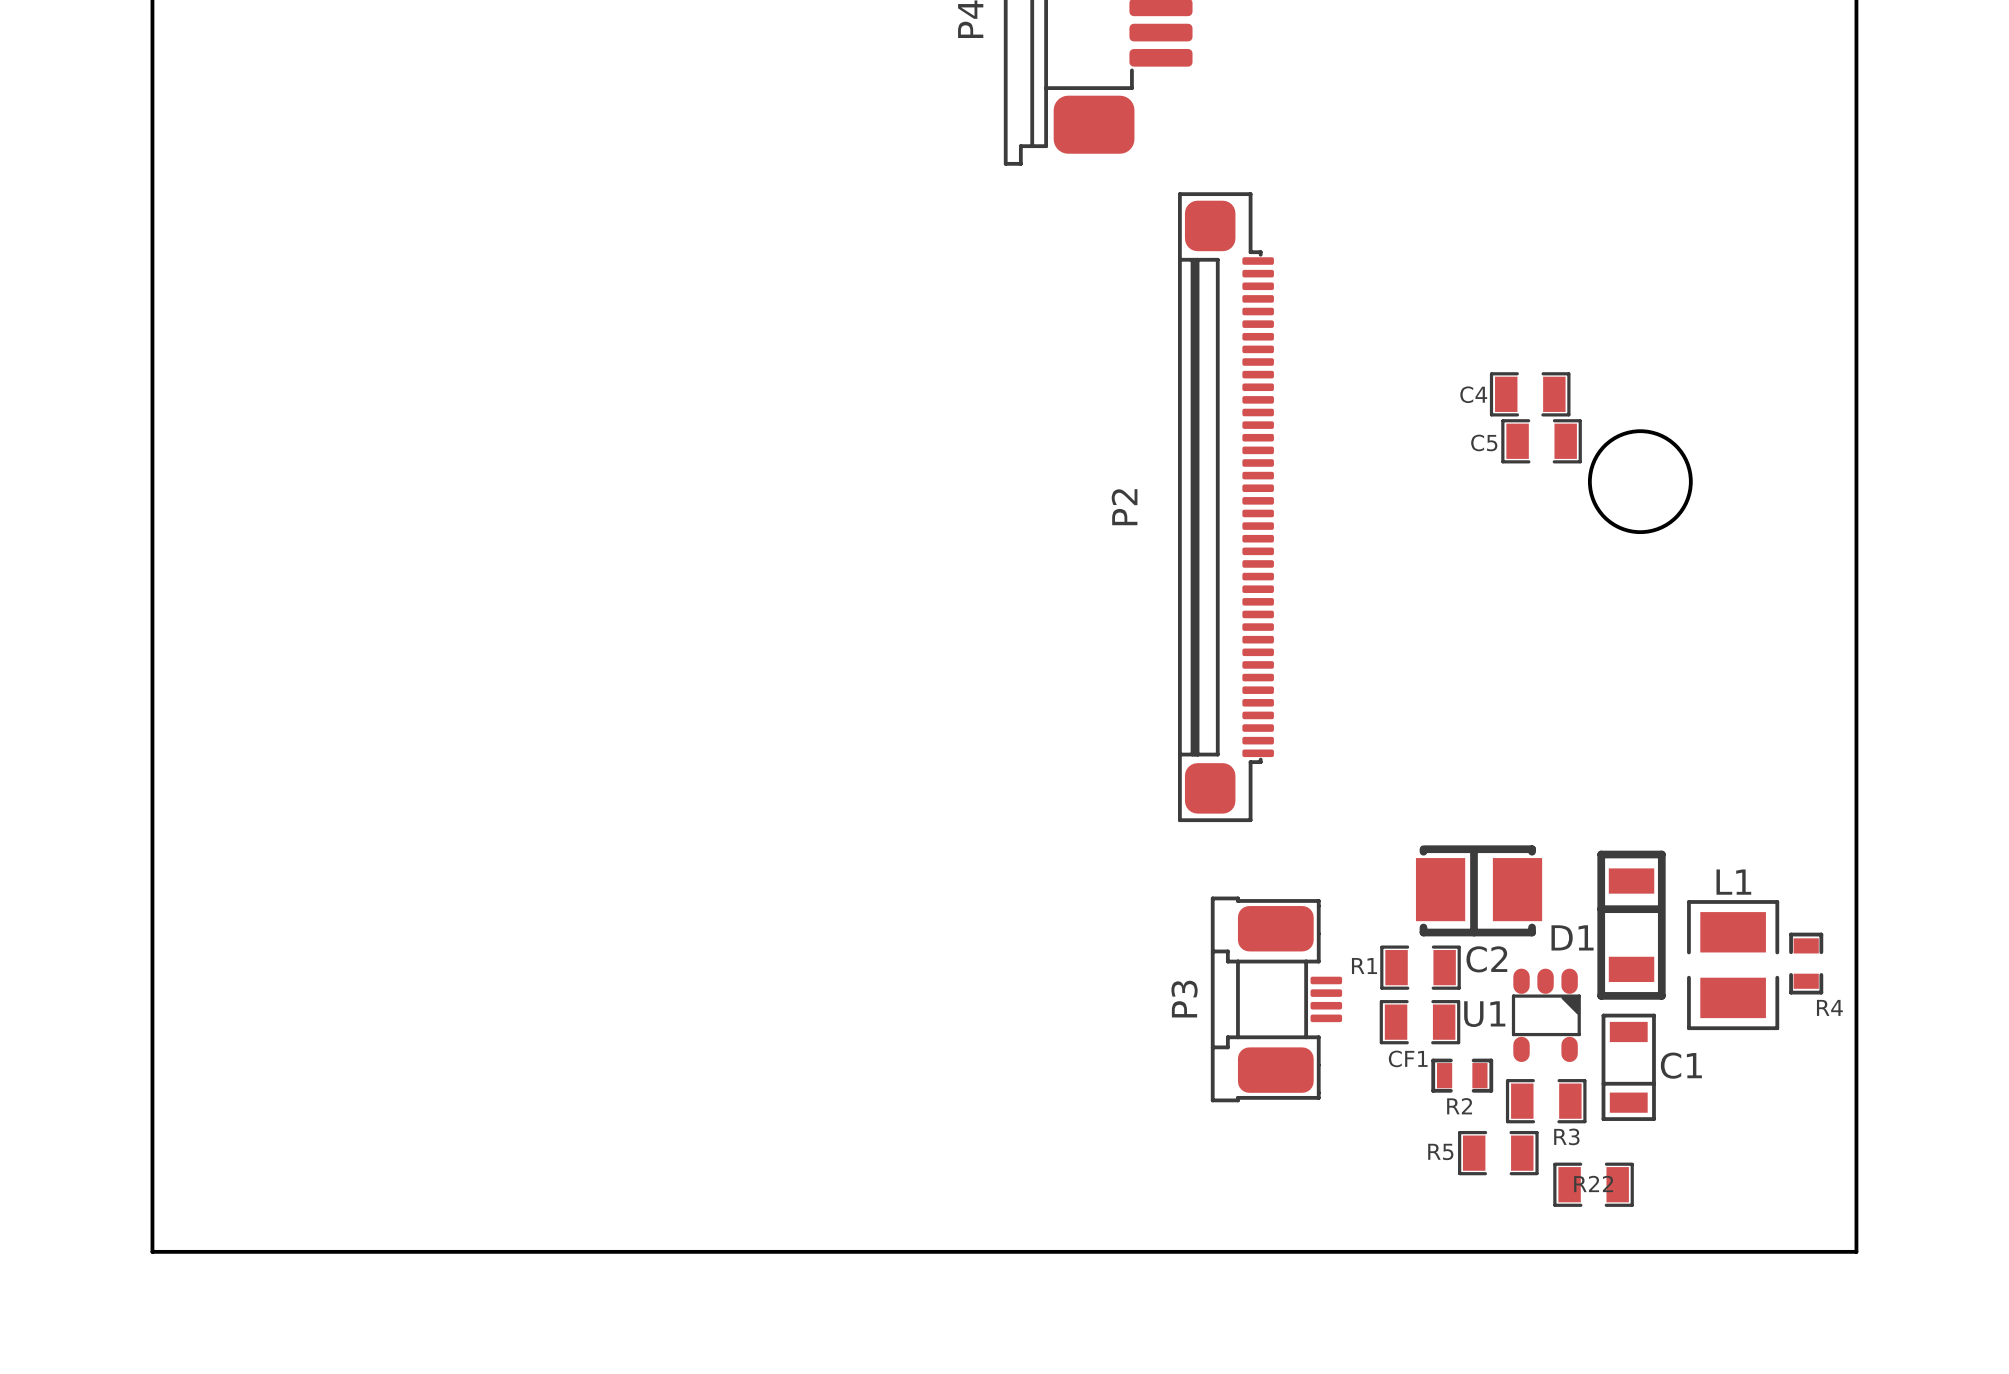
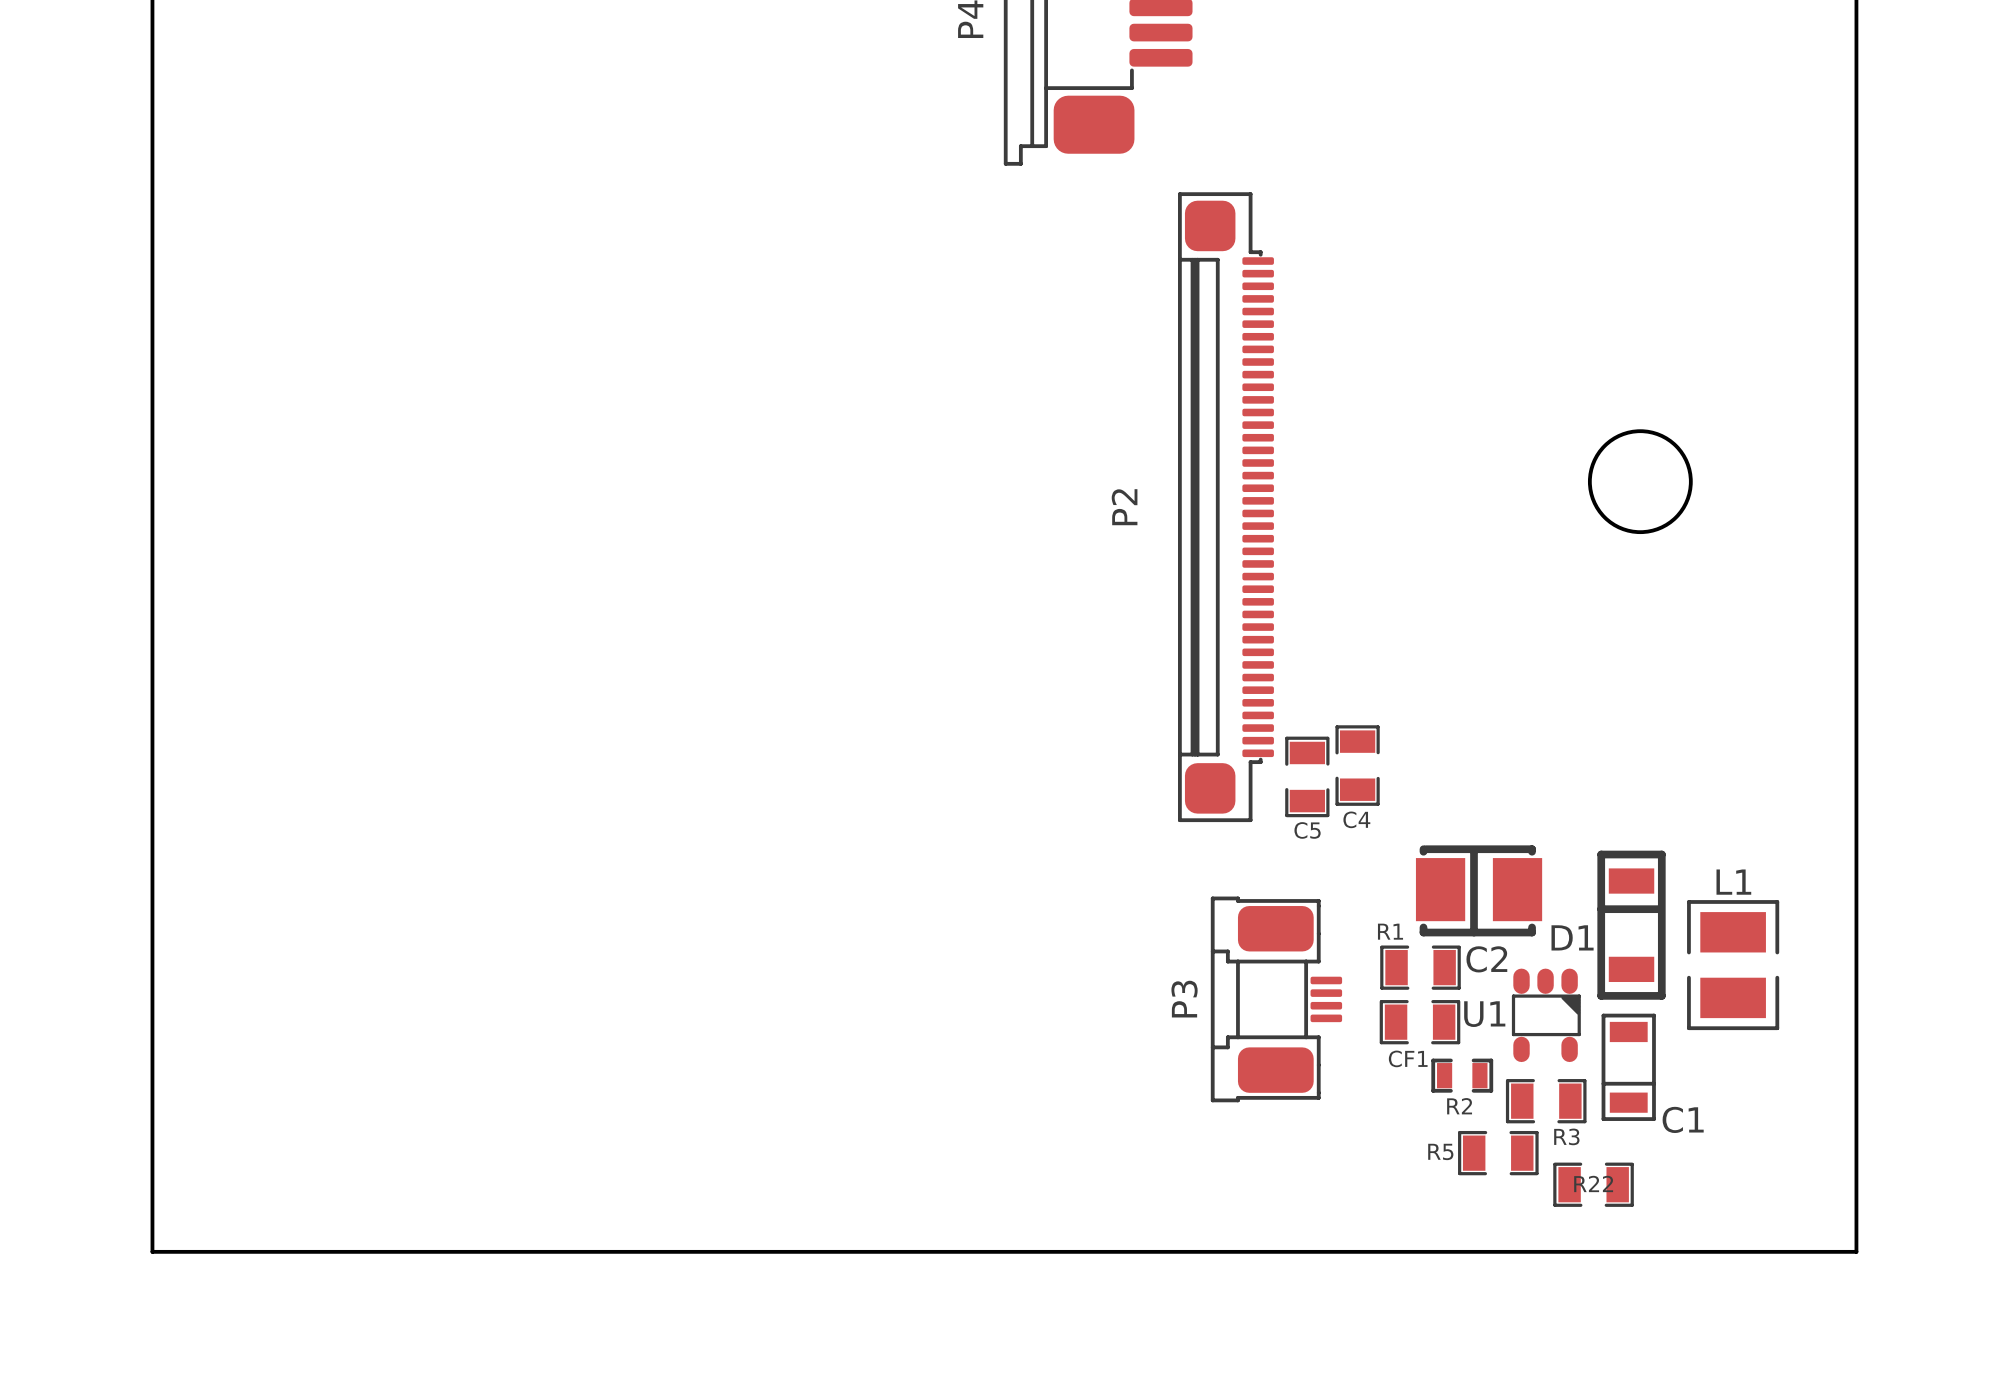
C4 name position: C4 (1473, 394) -> C4 (1356, 819)
C4 rotation: 0° (1530, 394) -> 90° clockwise (1357, 765)
C4 position: (1530, 394) -> (1357, 765)
C5 rotation: 0° (1541, 441) -> 90° clockwise (1307, 776)
C5 position: (1541, 441) -> (1307, 776)
C5 name position: C5 (1484, 442) -> C5 (1307, 830)
R4: (1806, 963) -> none
R1 name position: R1 (1364, 966) -> R1 (1390, 931)
C1 name position: C1 (1681, 1065) -> C1 (1683, 1119)

